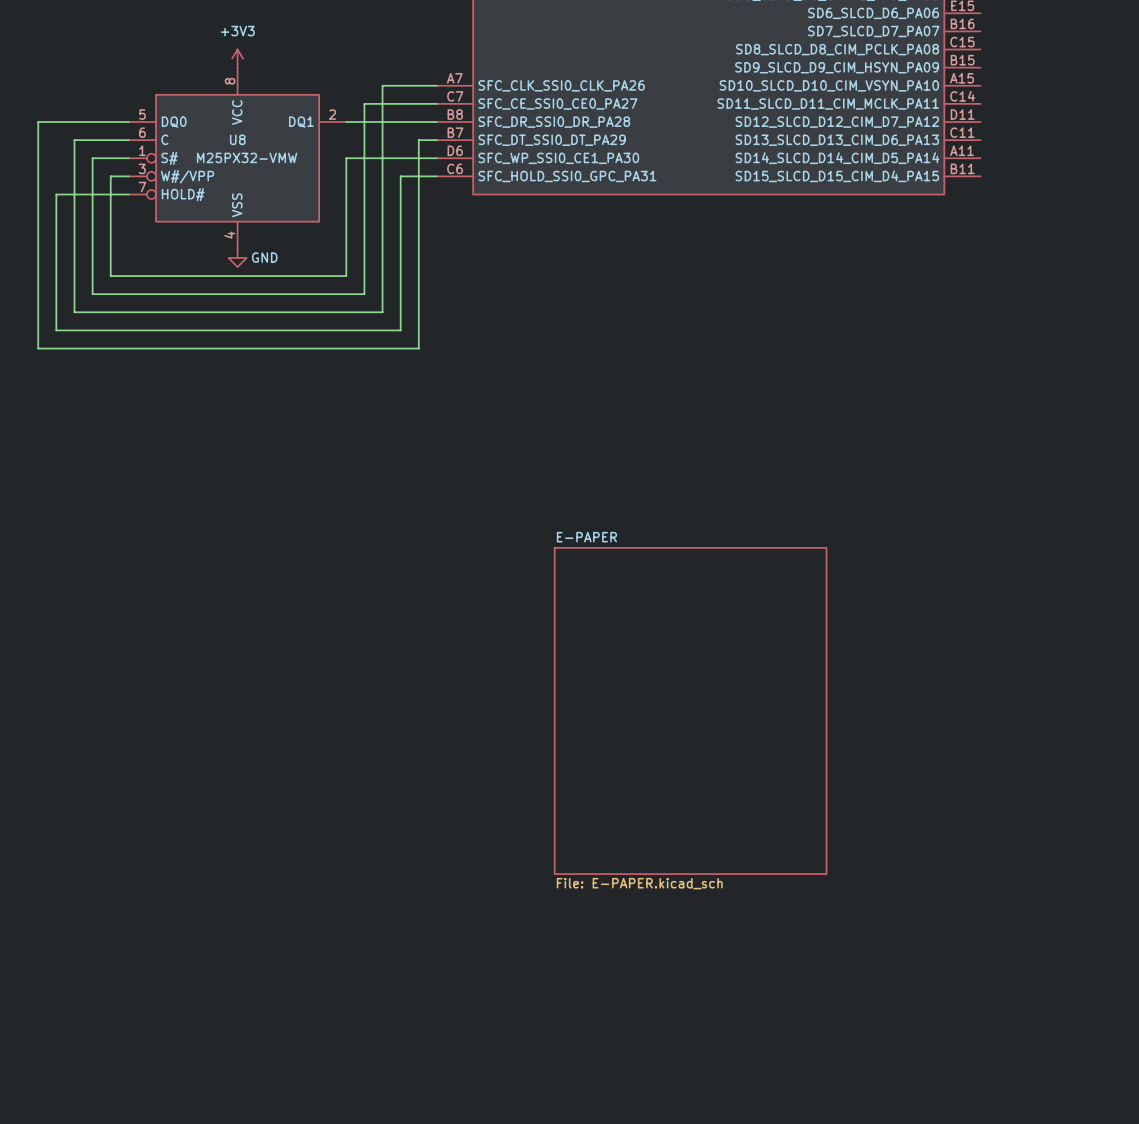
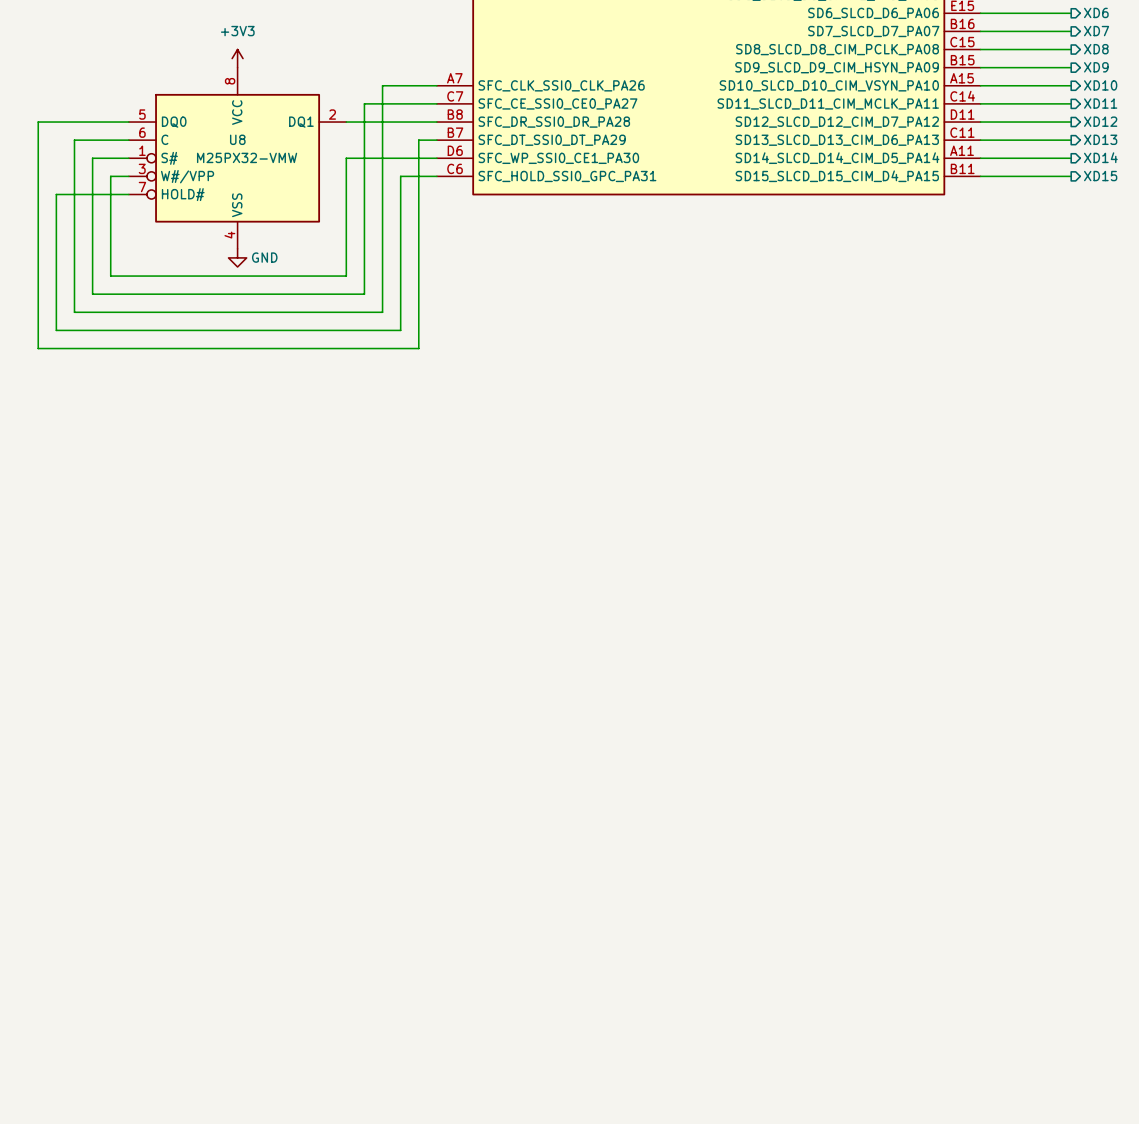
sheet pin: none -> XD6 (1096, 12)
wire: none -> (980, 13) (1071, 13)
wire: none -> (980, 31) (1071, 31)
sheet pin: none -> XD7 (1096, 31)
wire: none -> (980, 49) (1071, 49)
sheet pin: none -> XD8 (1096, 49)
wire: none -> (980, 67) (1071, 67)
sheet pin: none -> XD9 (1096, 67)
wire: none -> (980, 85) (1071, 85)
sheet pin: none -> XD10 (1100, 85)
wire: none -> (980, 103) (1071, 103)
sheet pin: none -> XD11 (1100, 103)
sheet pin: none -> XD12 (1100, 121)
wire: none -> (980, 122) (1071, 122)
sheet pin: none -> XD13 (1100, 139)
wire: none -> (980, 140) (1071, 140)
sheet pin: none -> XD14 (1100, 157)
wire: none -> (980, 158) (1071, 158)
wire: none -> (980, 176) (1071, 176)
sheet pin: none -> XD15 (1100, 176)
sheet E-PAPER: File: E-PAPER.kicad_sch (690, 710) -> none

